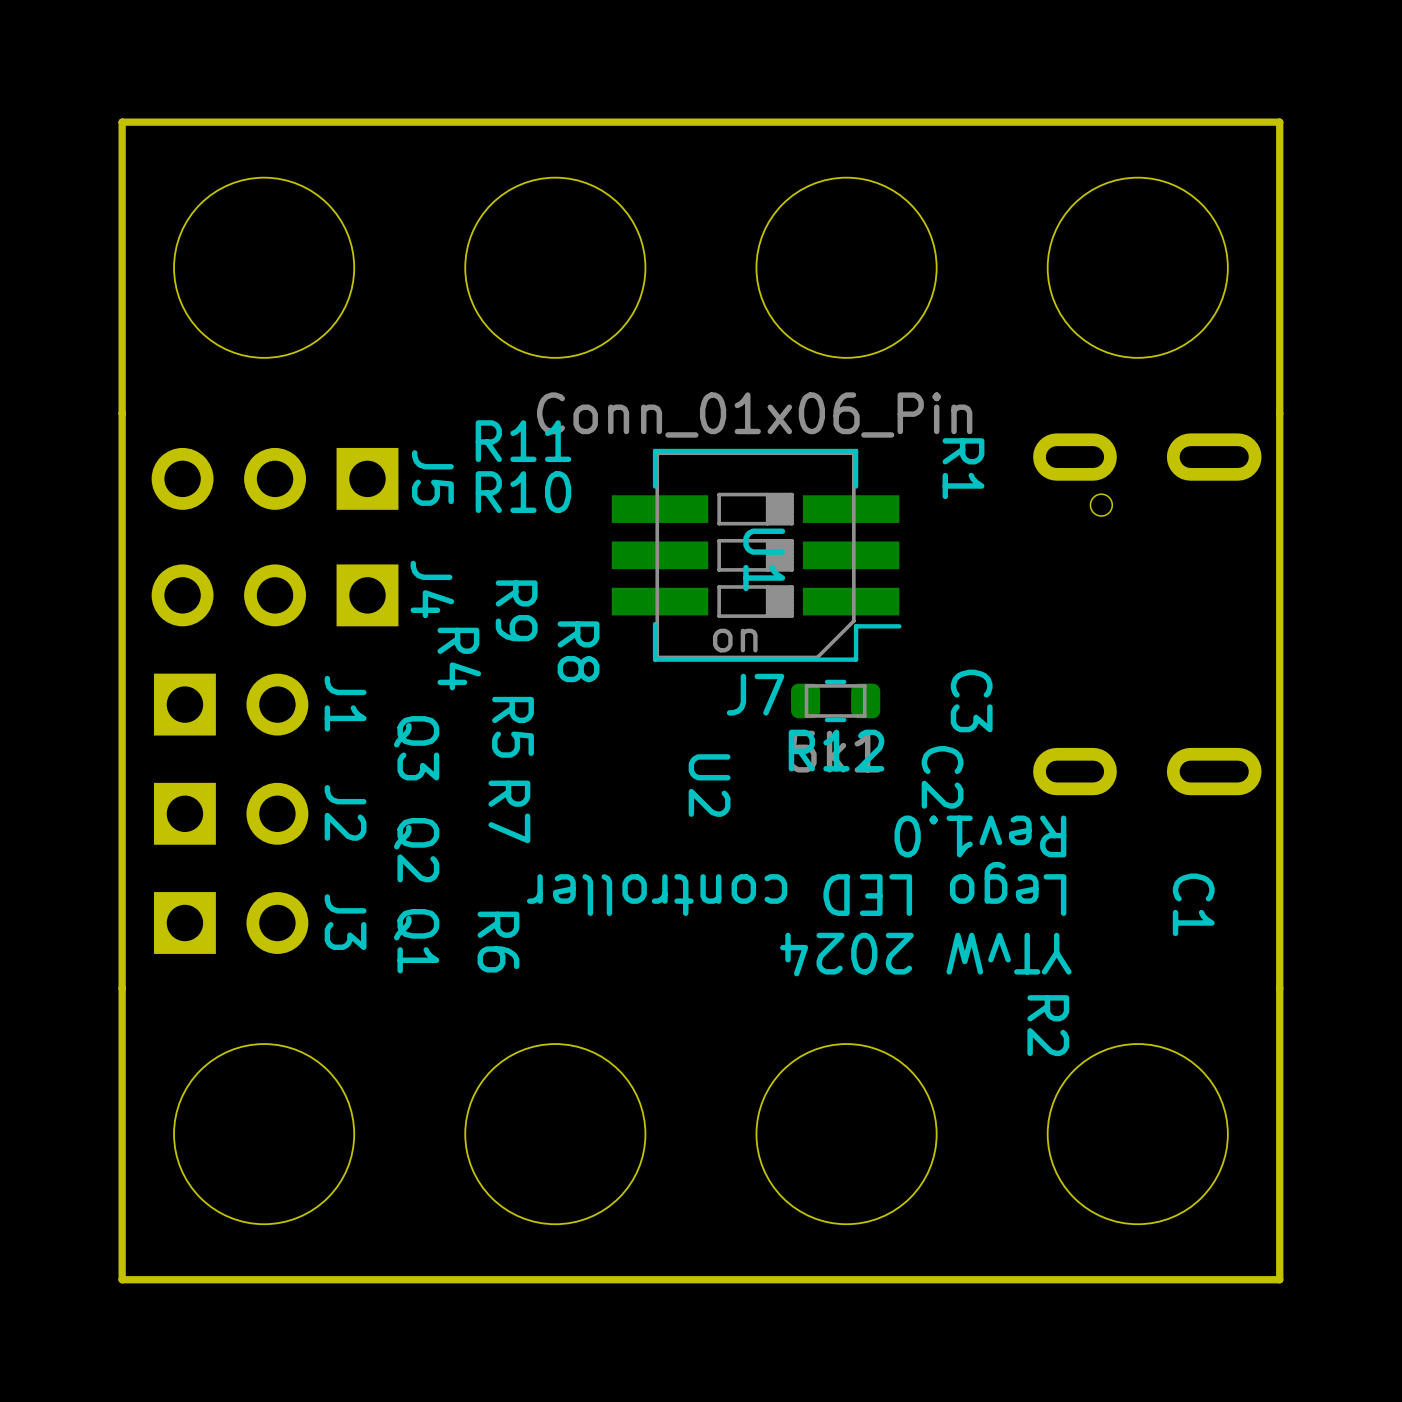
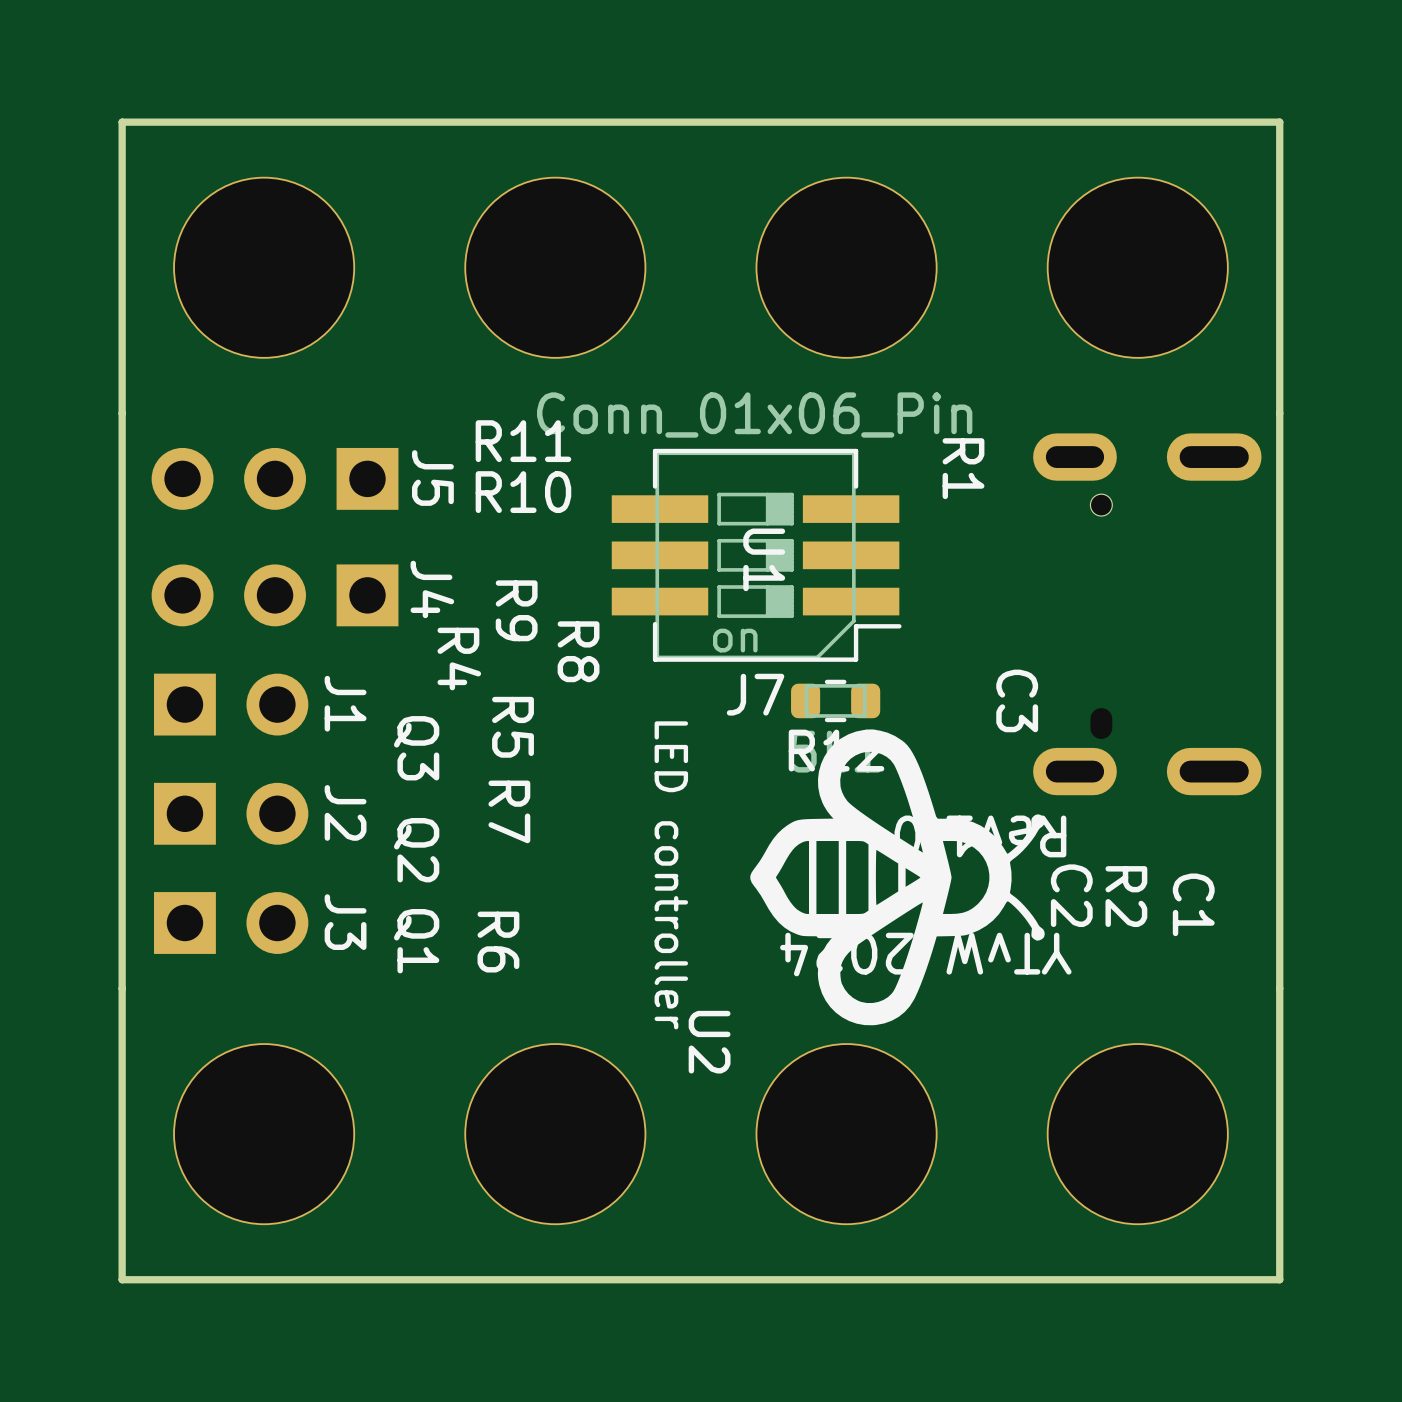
C3 position: (971, 700) -> (1017, 700)
drawing: none -> [750, 729, 1045, 1026]
C2 position: (942, 777) -> (1071, 895)
U2 position: (709, 785) -> (709, 1042)
text: Lego LED controller (796, 888) -> LED controller (671, 875)
R2 position: (1048, 1025) -> (1126, 896)

